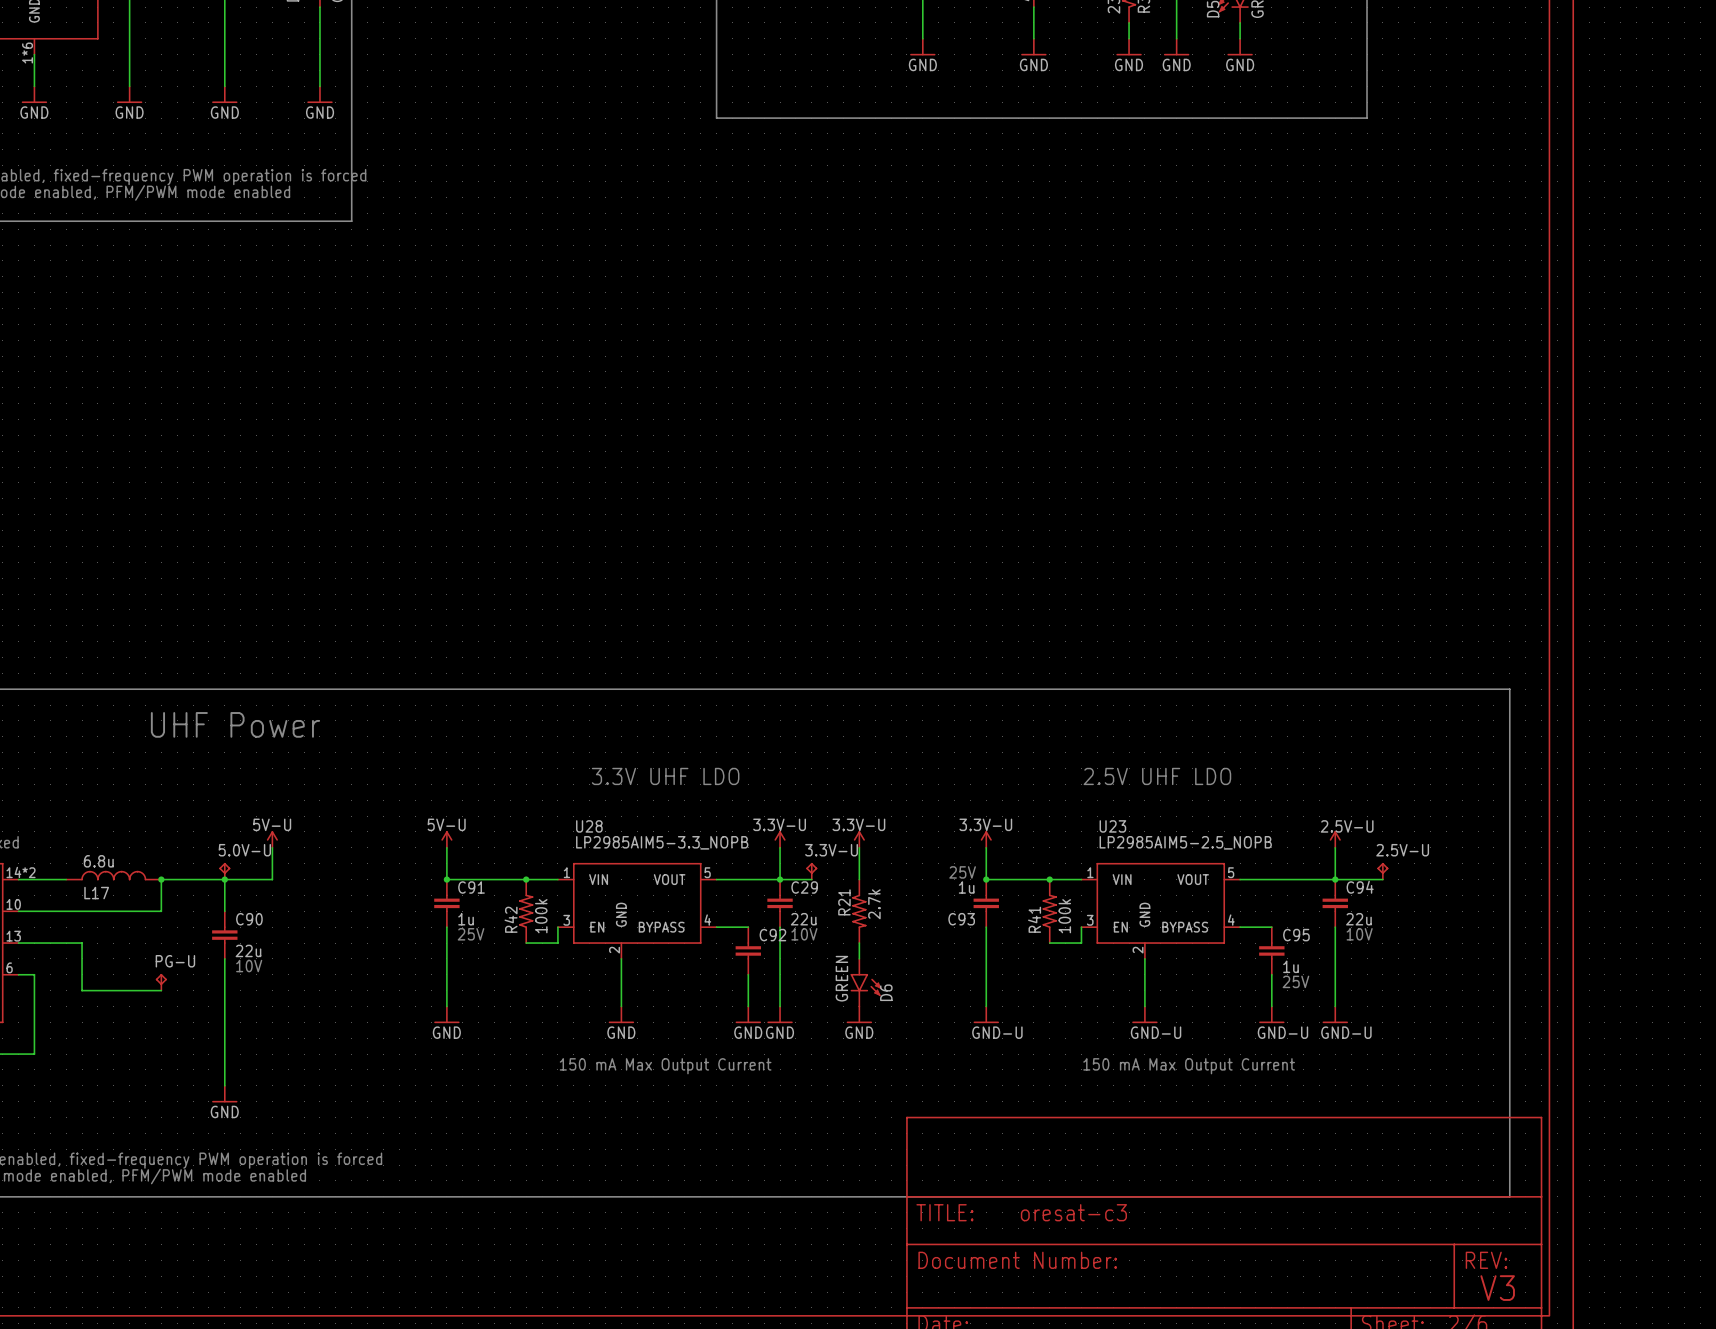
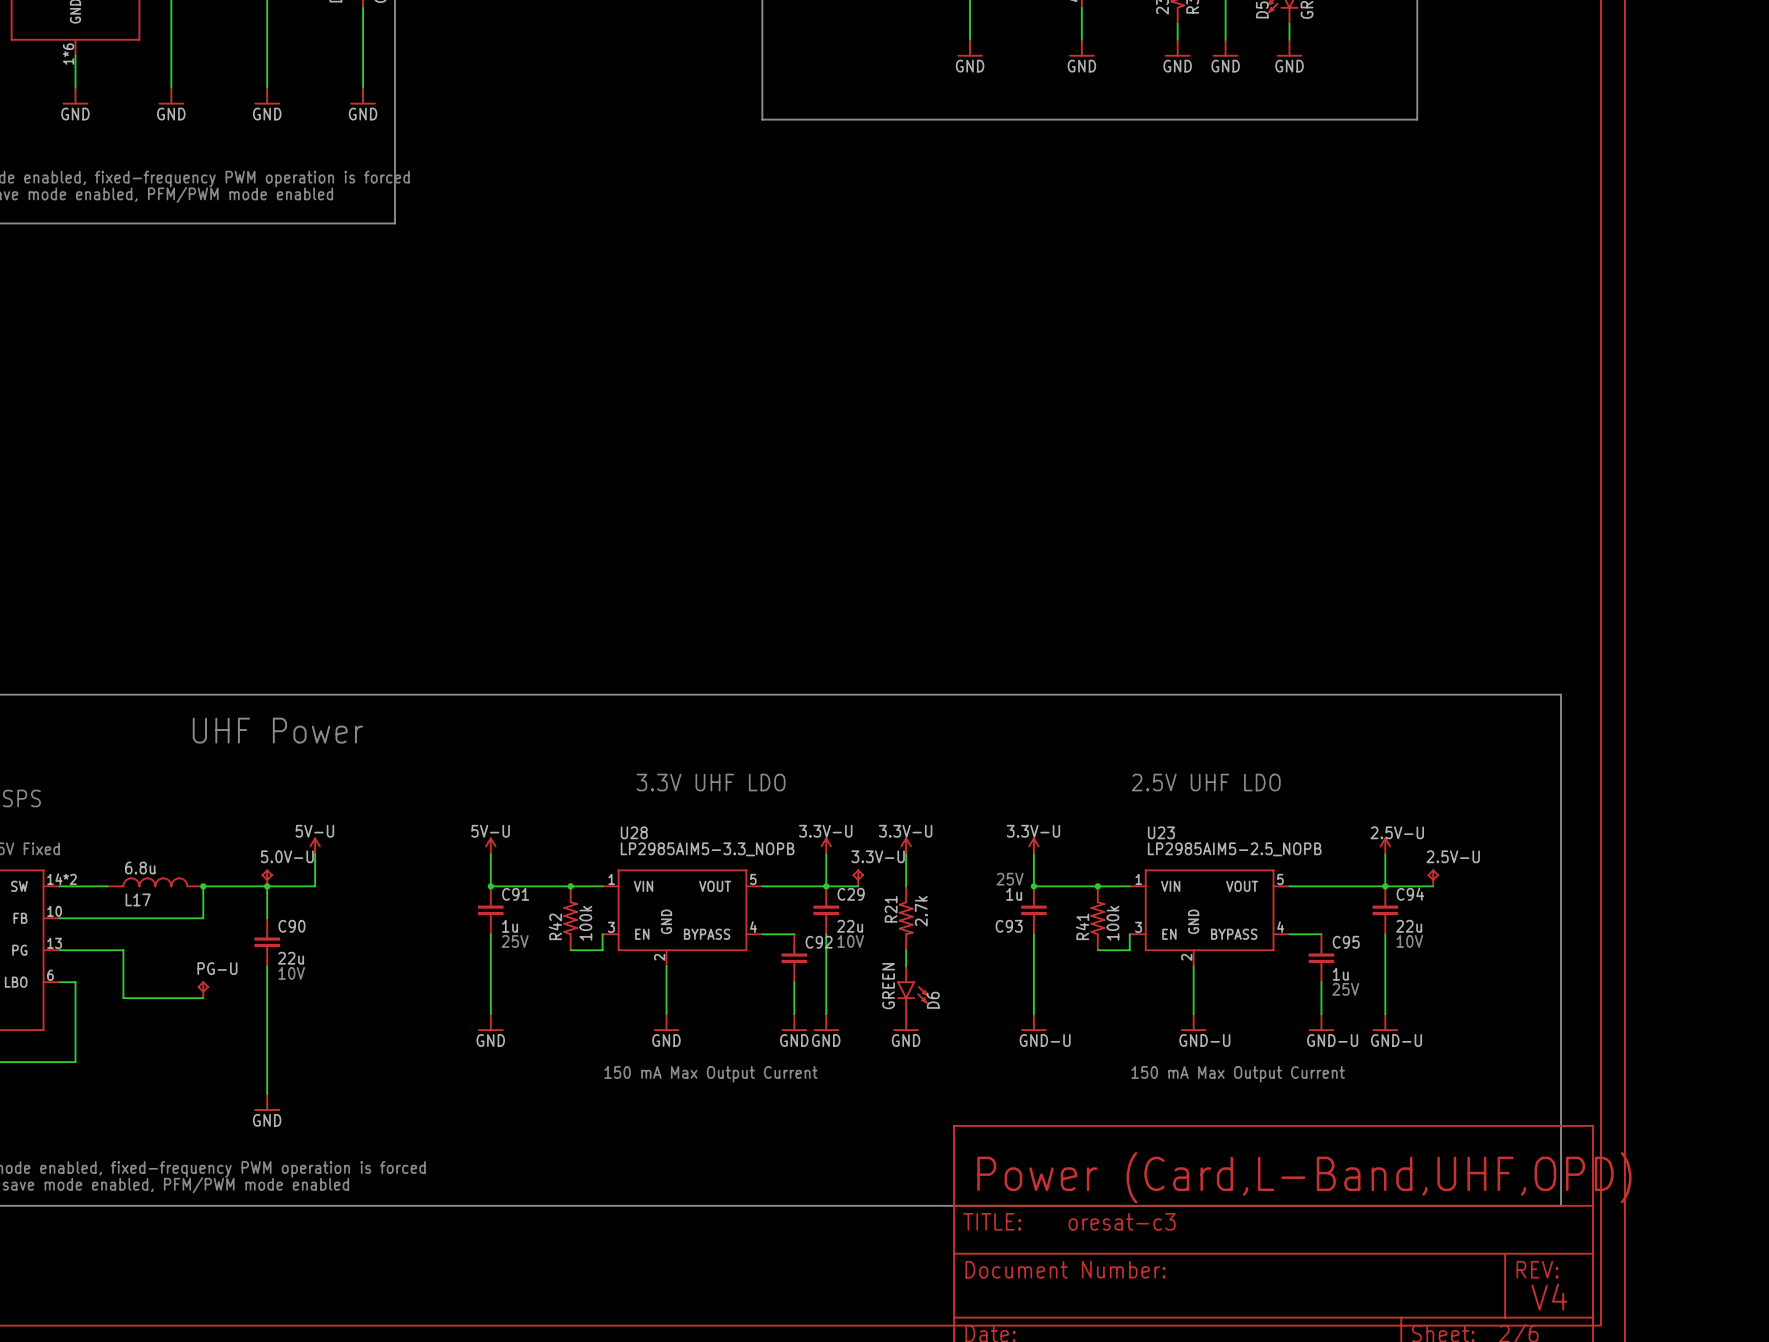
text: none -> Power (Card,L-Band,UHF,OPD) (1304, 1177)
text: V3 (1497, 1288) -> V4 (1549, 1297)

